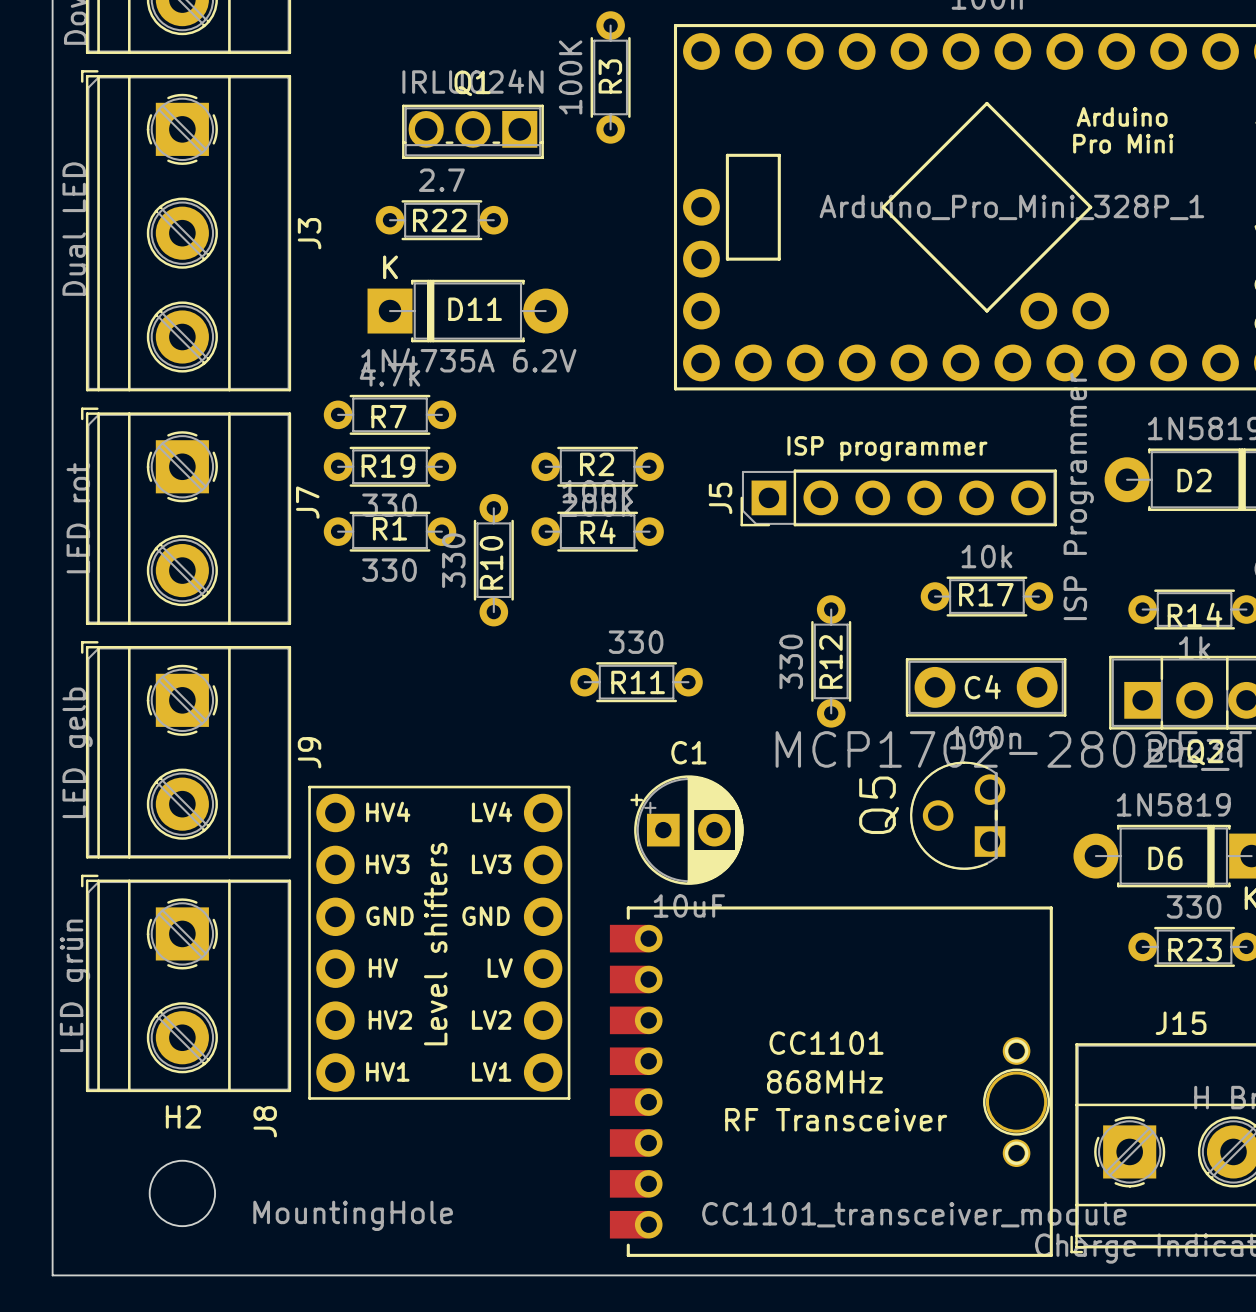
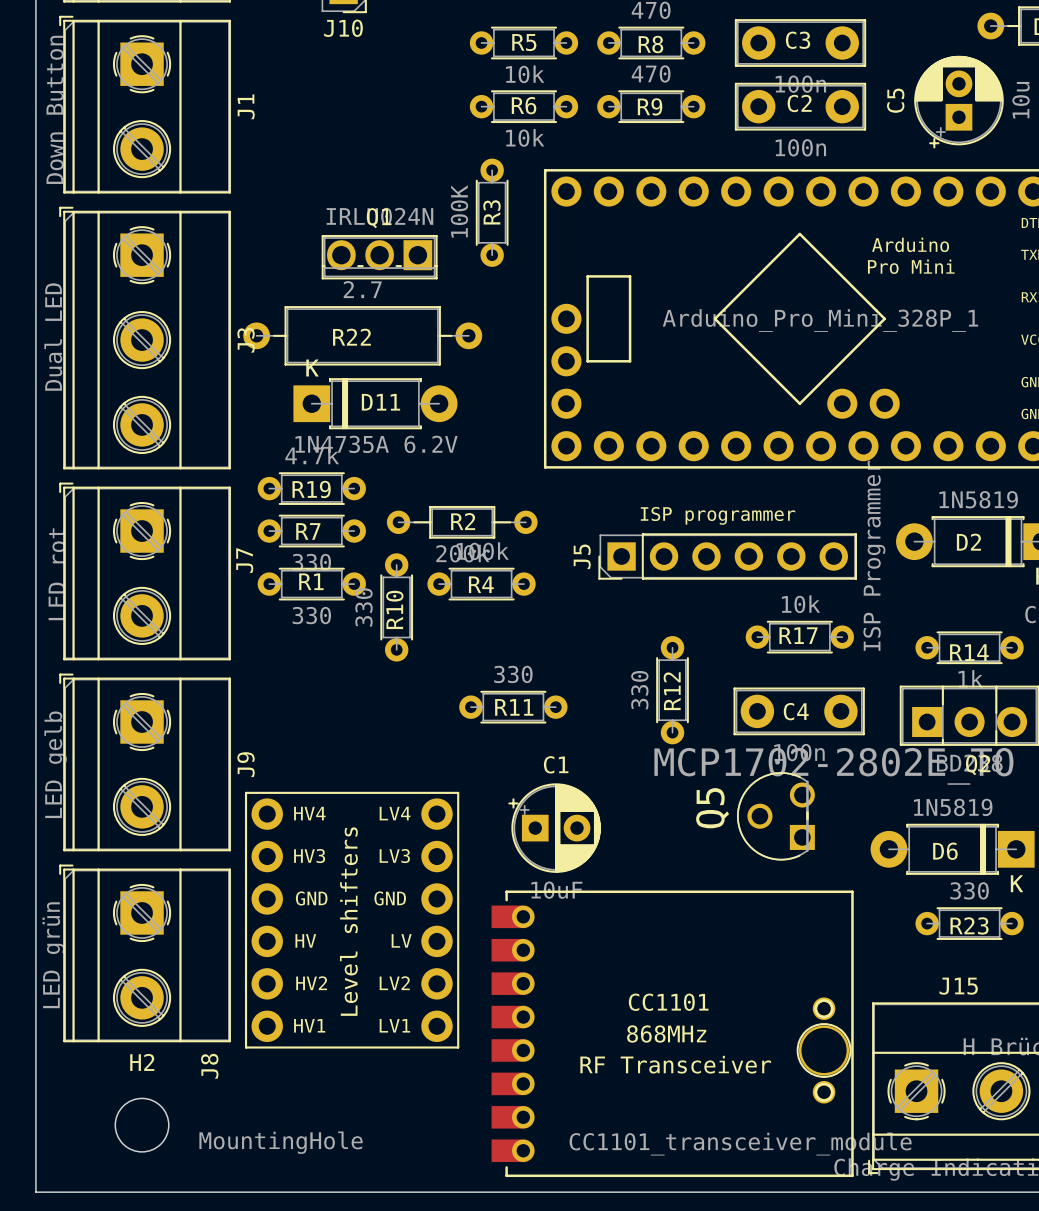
R22 footprint: [375, 200, 509, 241] -> [243, 306, 483, 366]
R7 name position: R7 (388, 416) -> R7 (308, 531)
R2 footprint: [531, 446, 664, 487] -> [386, 505, 538, 539]
R19 name position: R19 (388, 466) -> R19 (311, 489)

